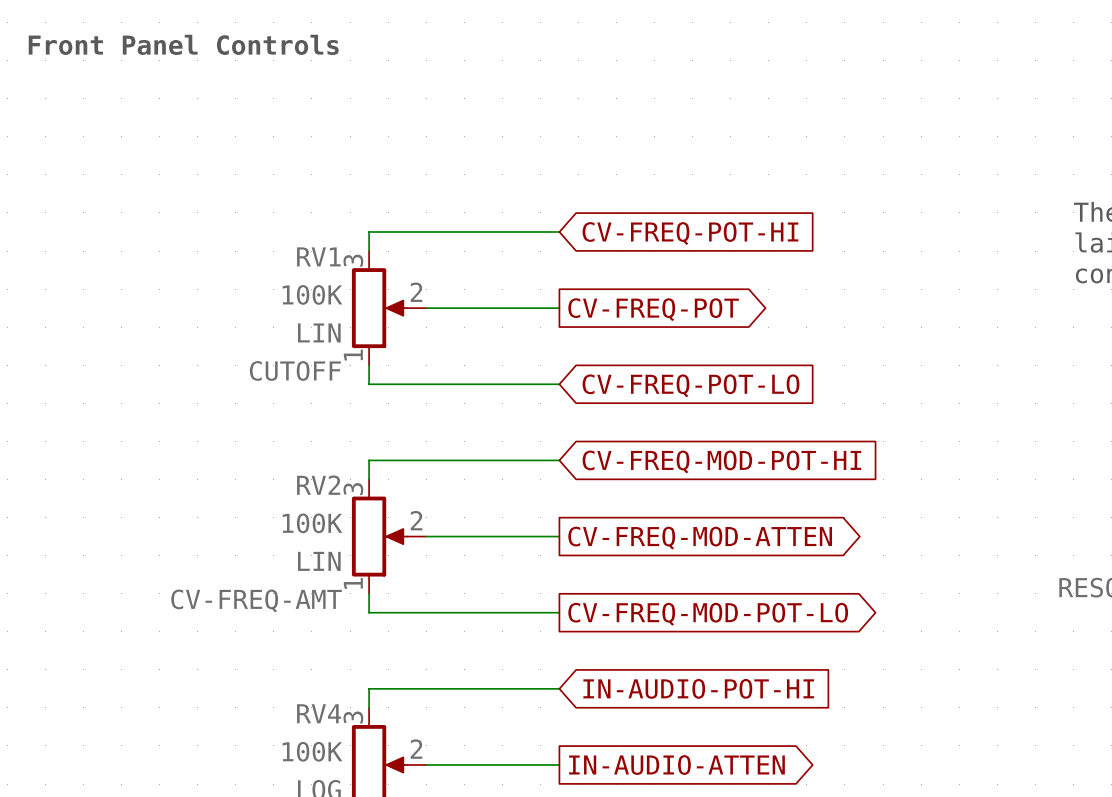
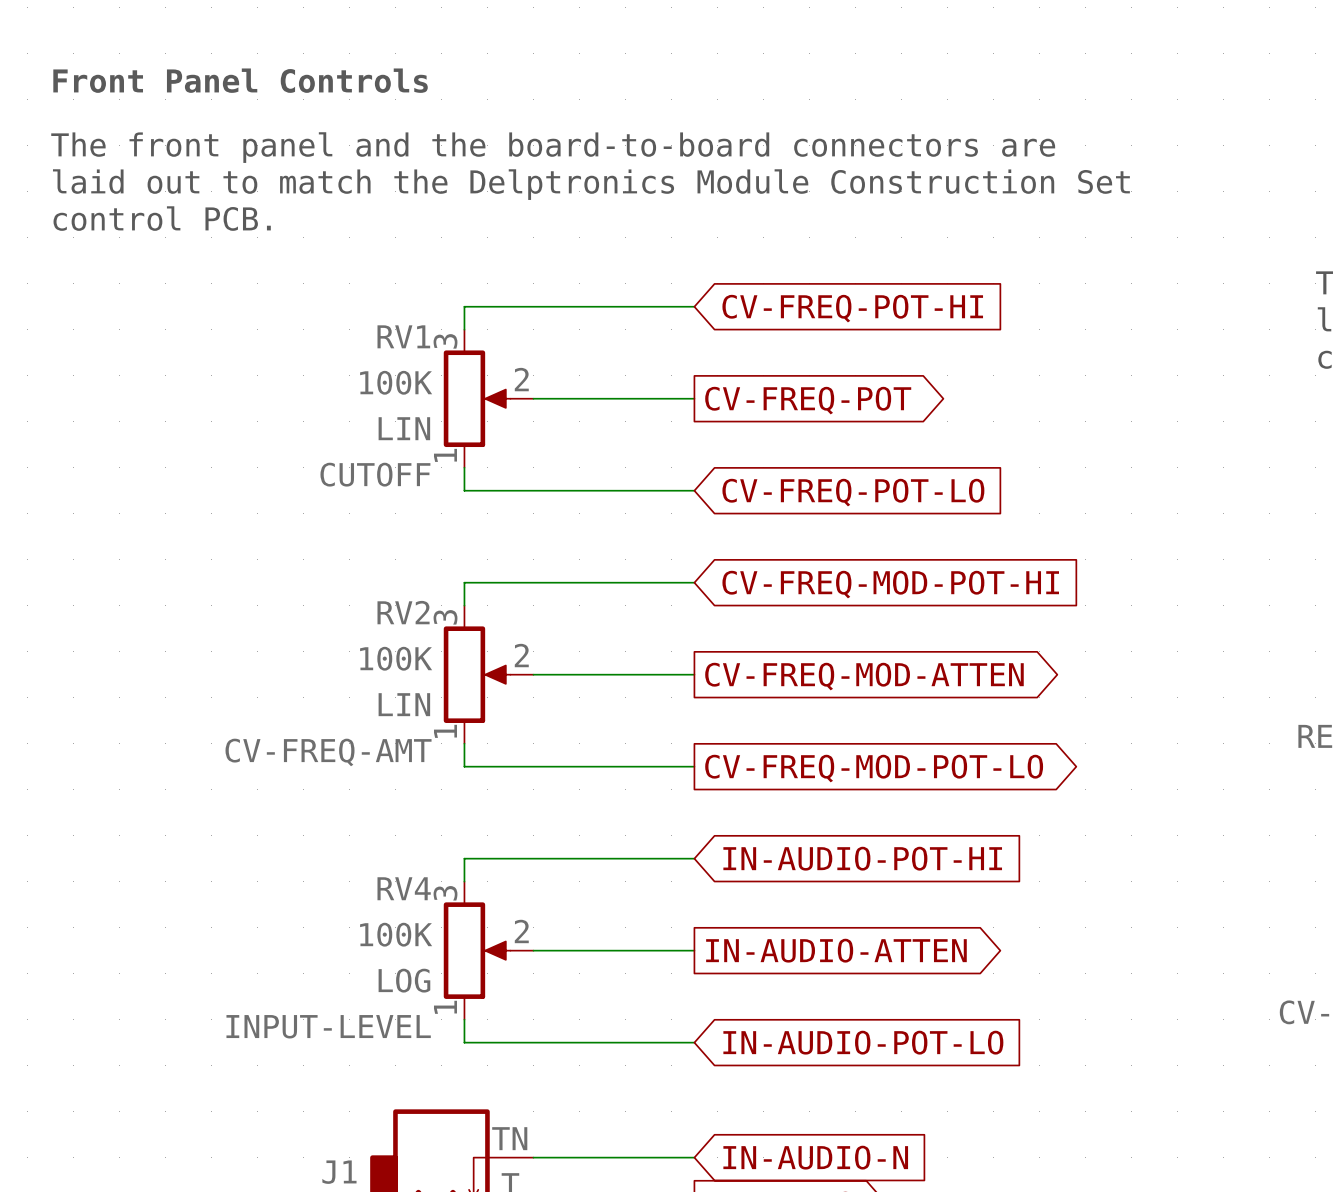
text: none -> The front panel and the board-to-board connectors are (553, 147)
text: none -> laid out to match the Delptronics Module Construction Set (591, 184)
text: none -> control PCB. (162, 218)

